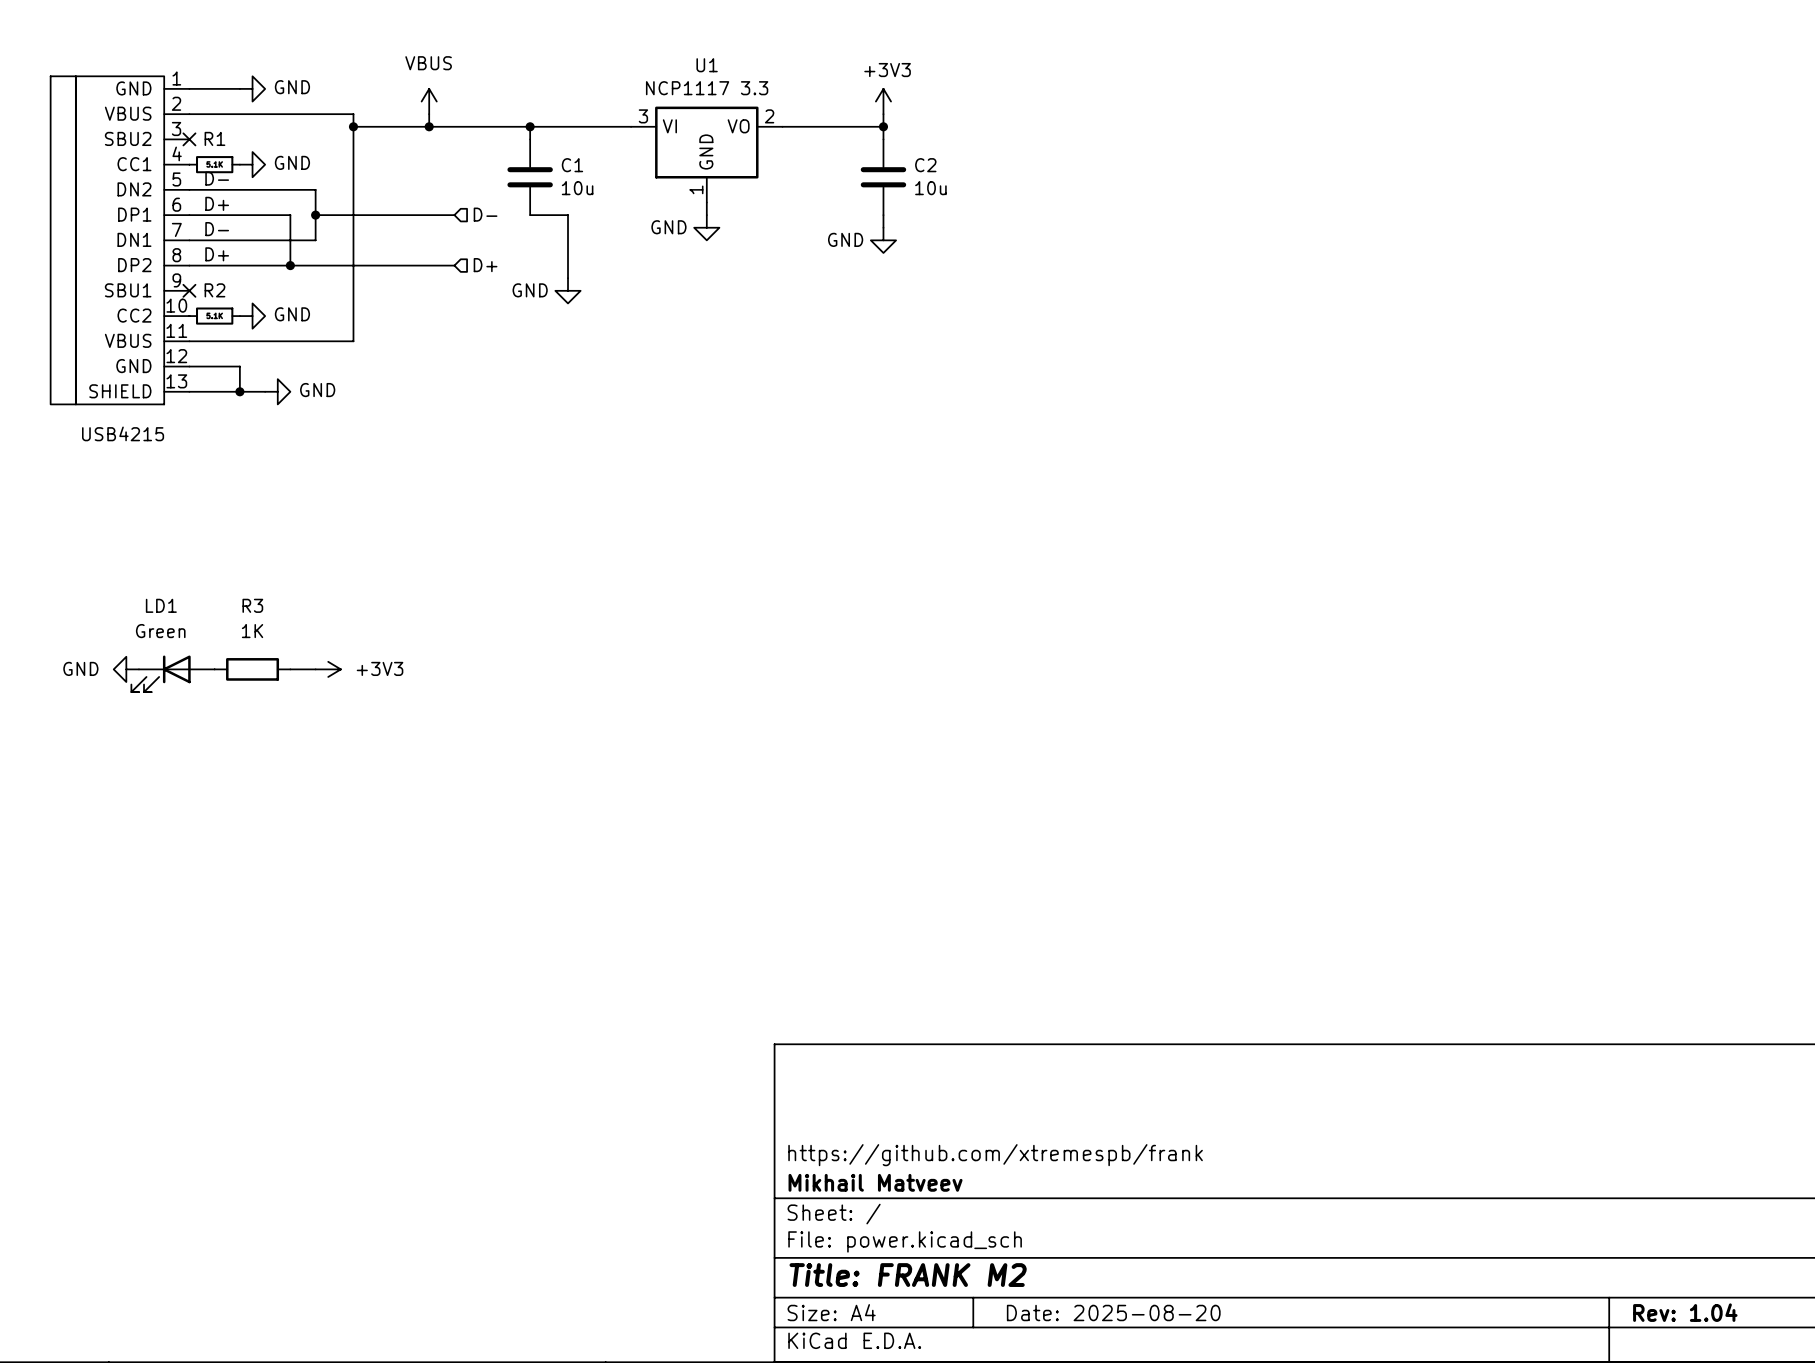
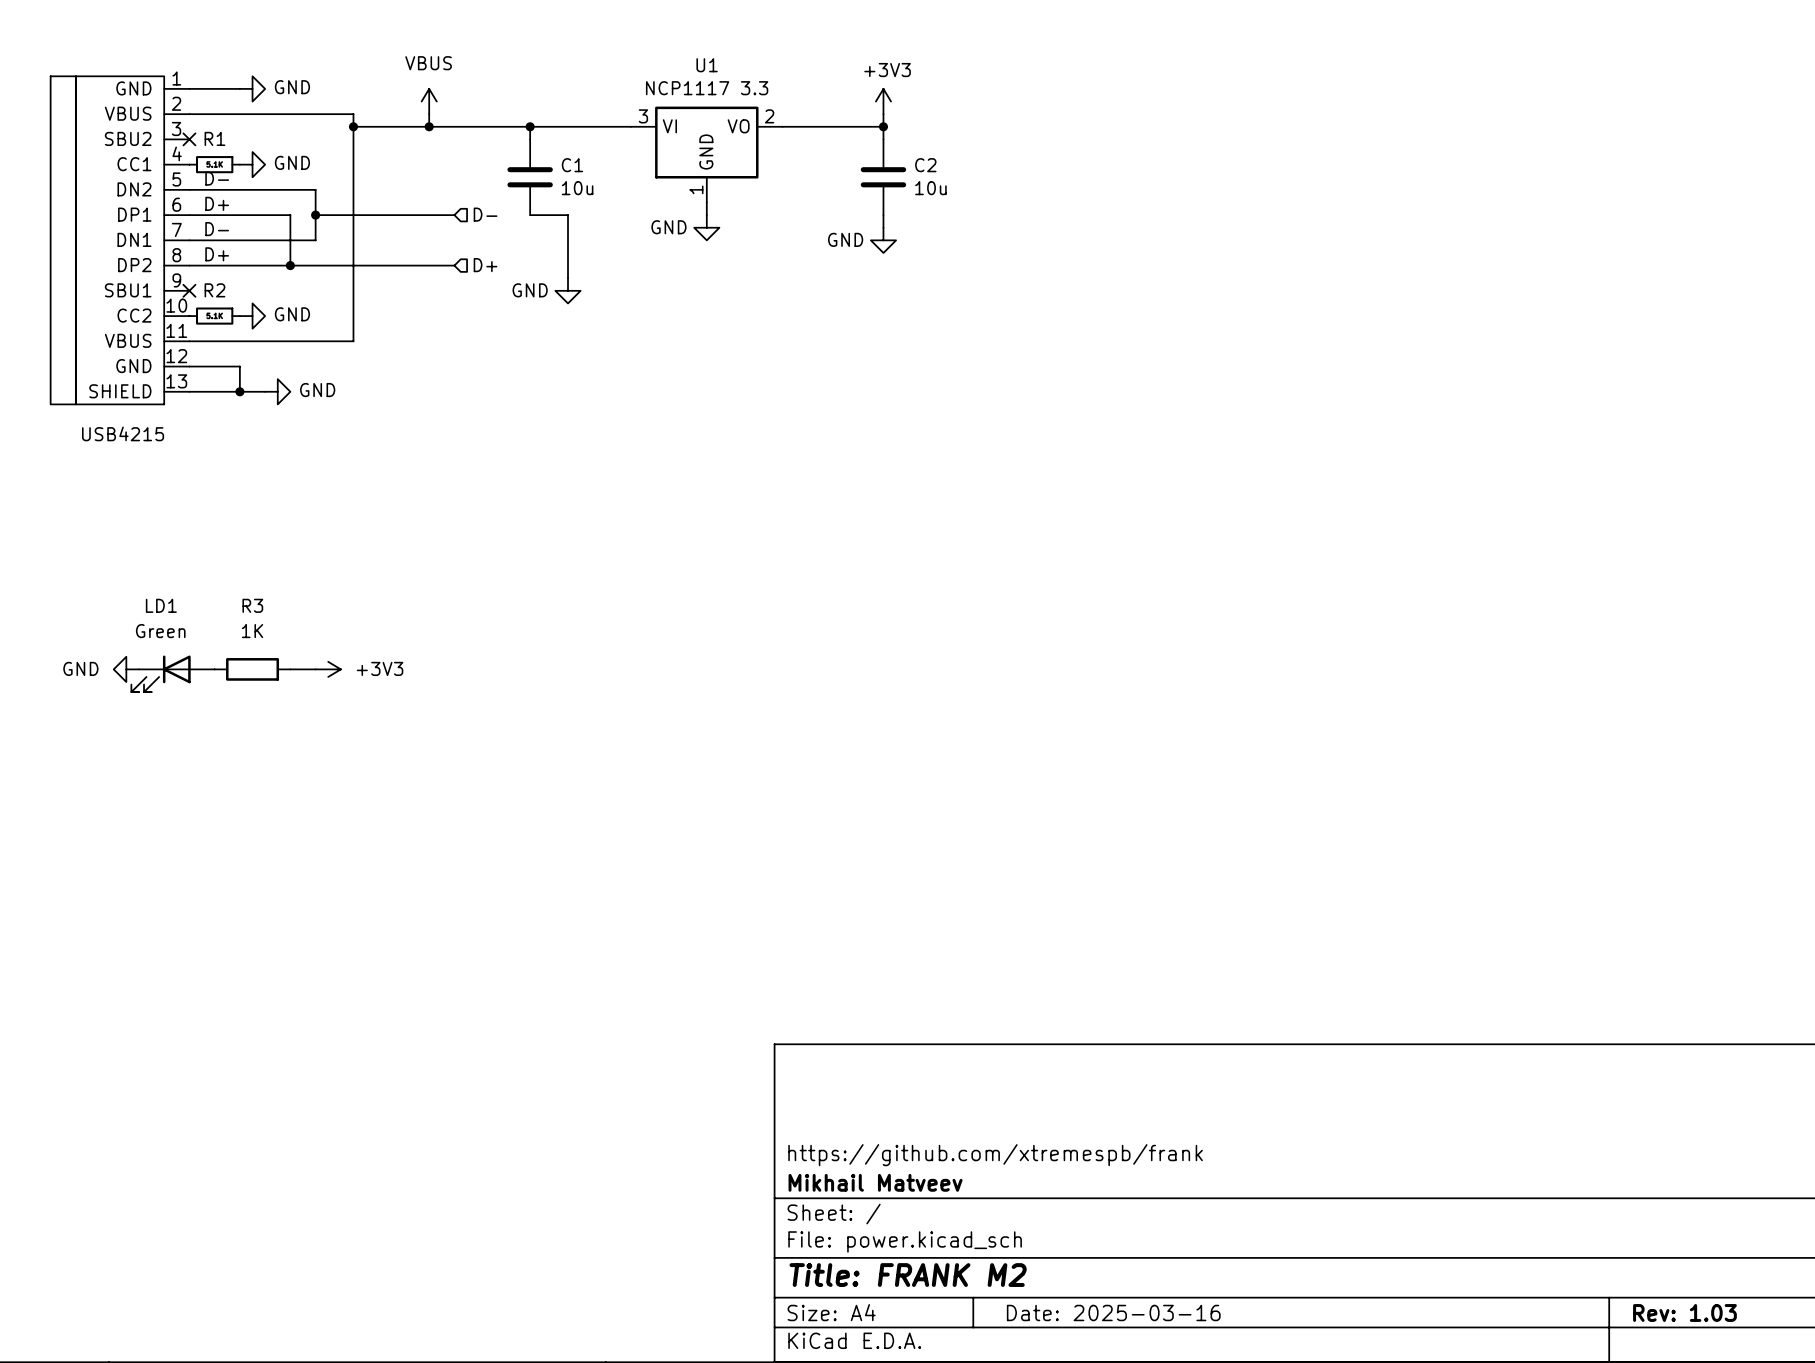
title block: Date: 2025-08-20 (1113, 1312) -> Date: 2025-03-16 (1113, 1312)
title block: Rev: 1.04 (1685, 1312) -> Rev: 1.03 (1684, 1312)

